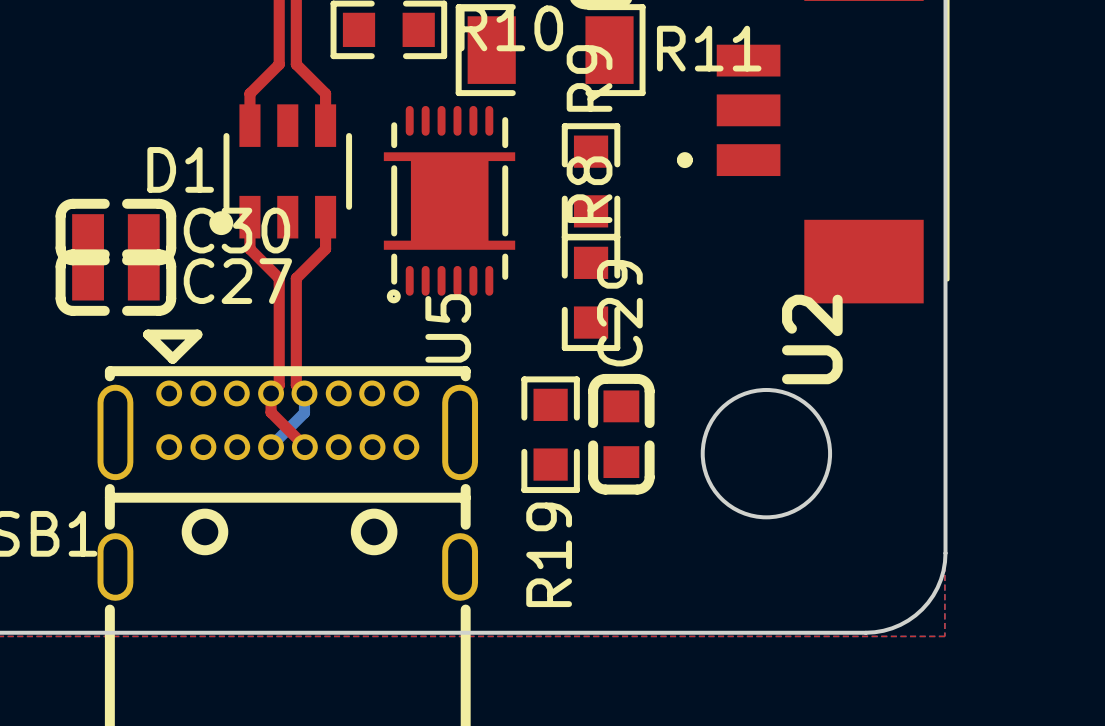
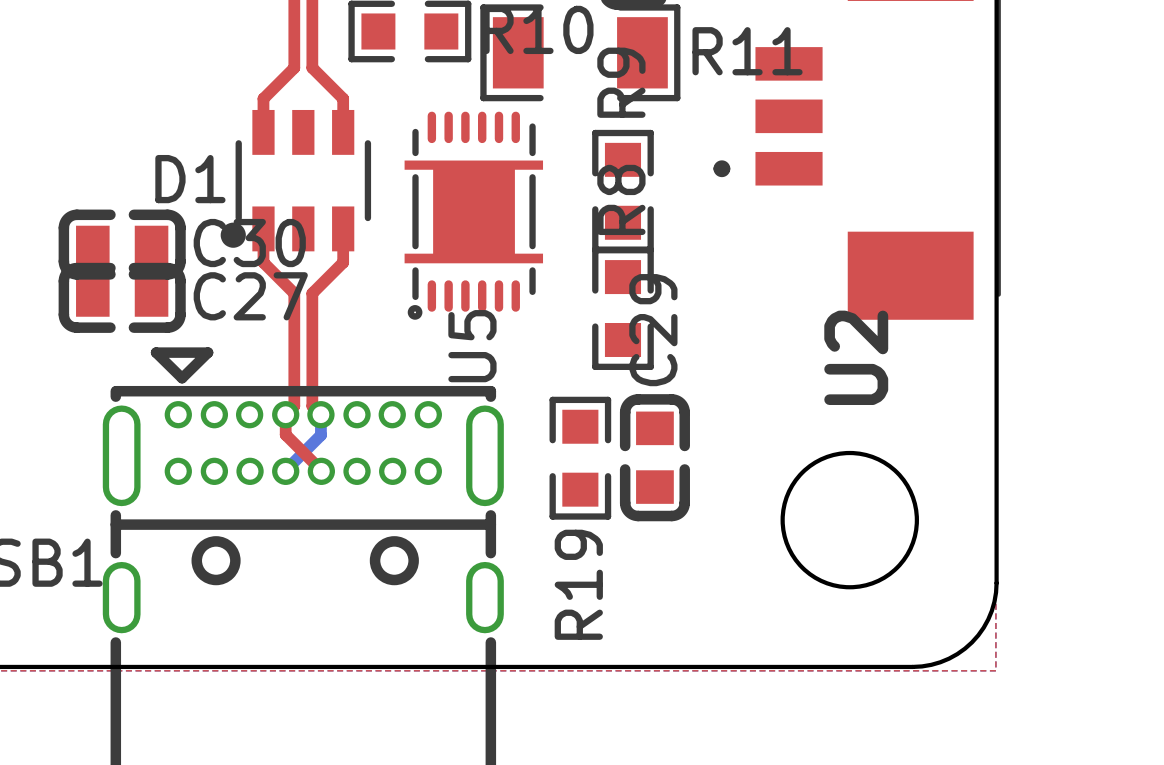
round board edge position: (766, 453) -> (849, 520)

